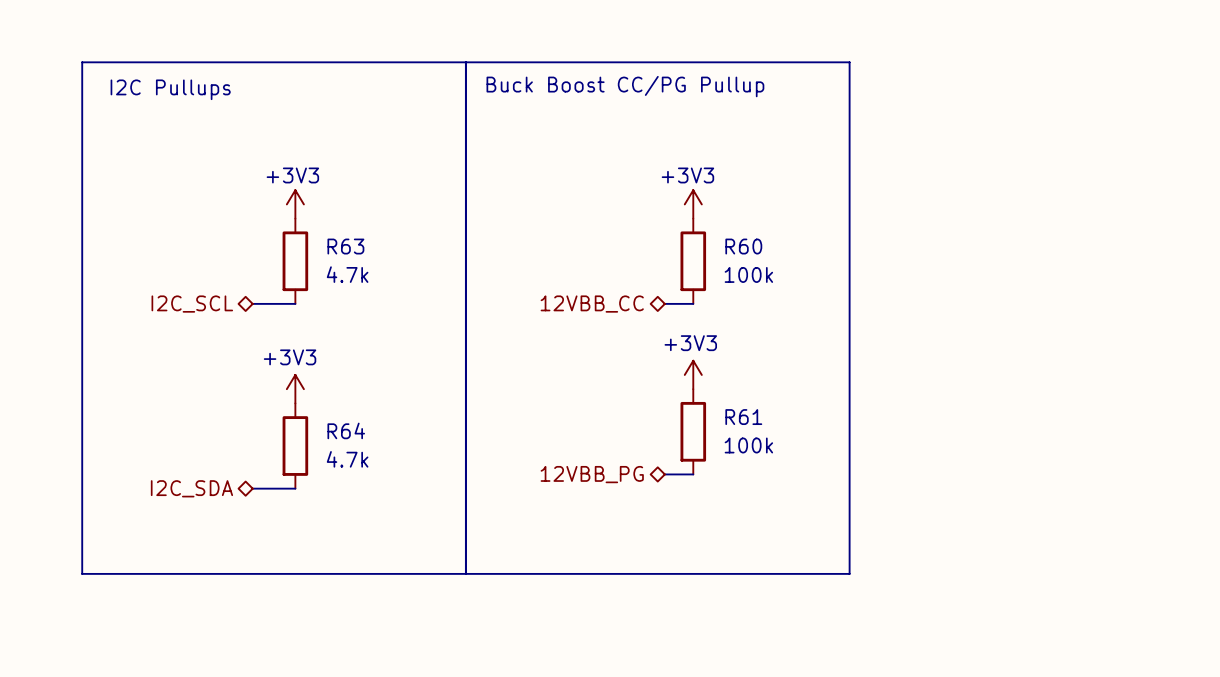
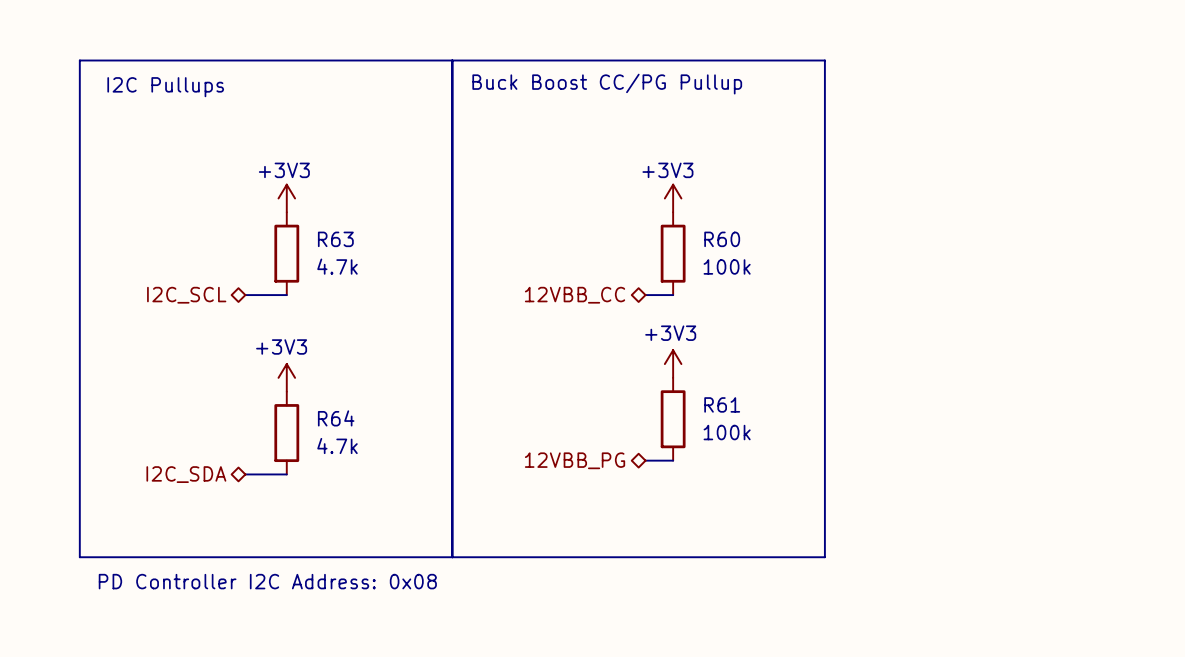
text: none -> PD Controller I2C Address: 0x08 (267, 581)

